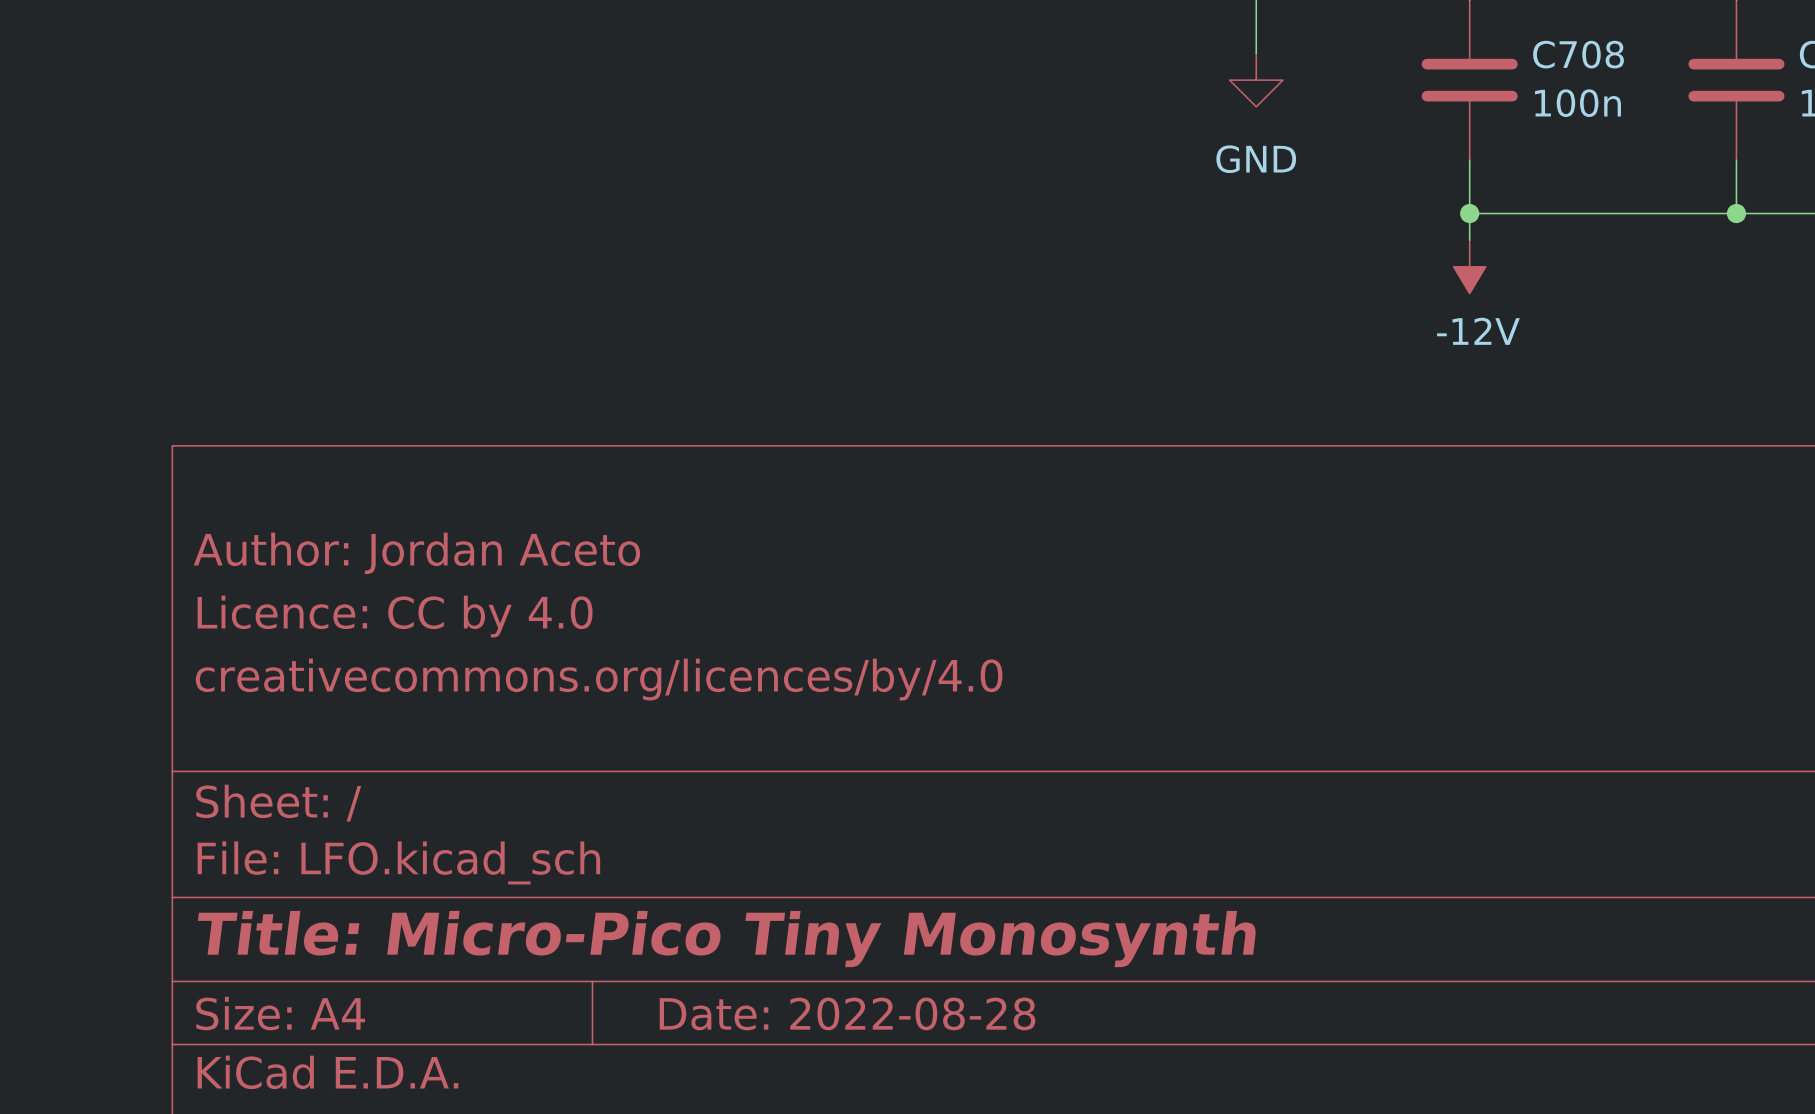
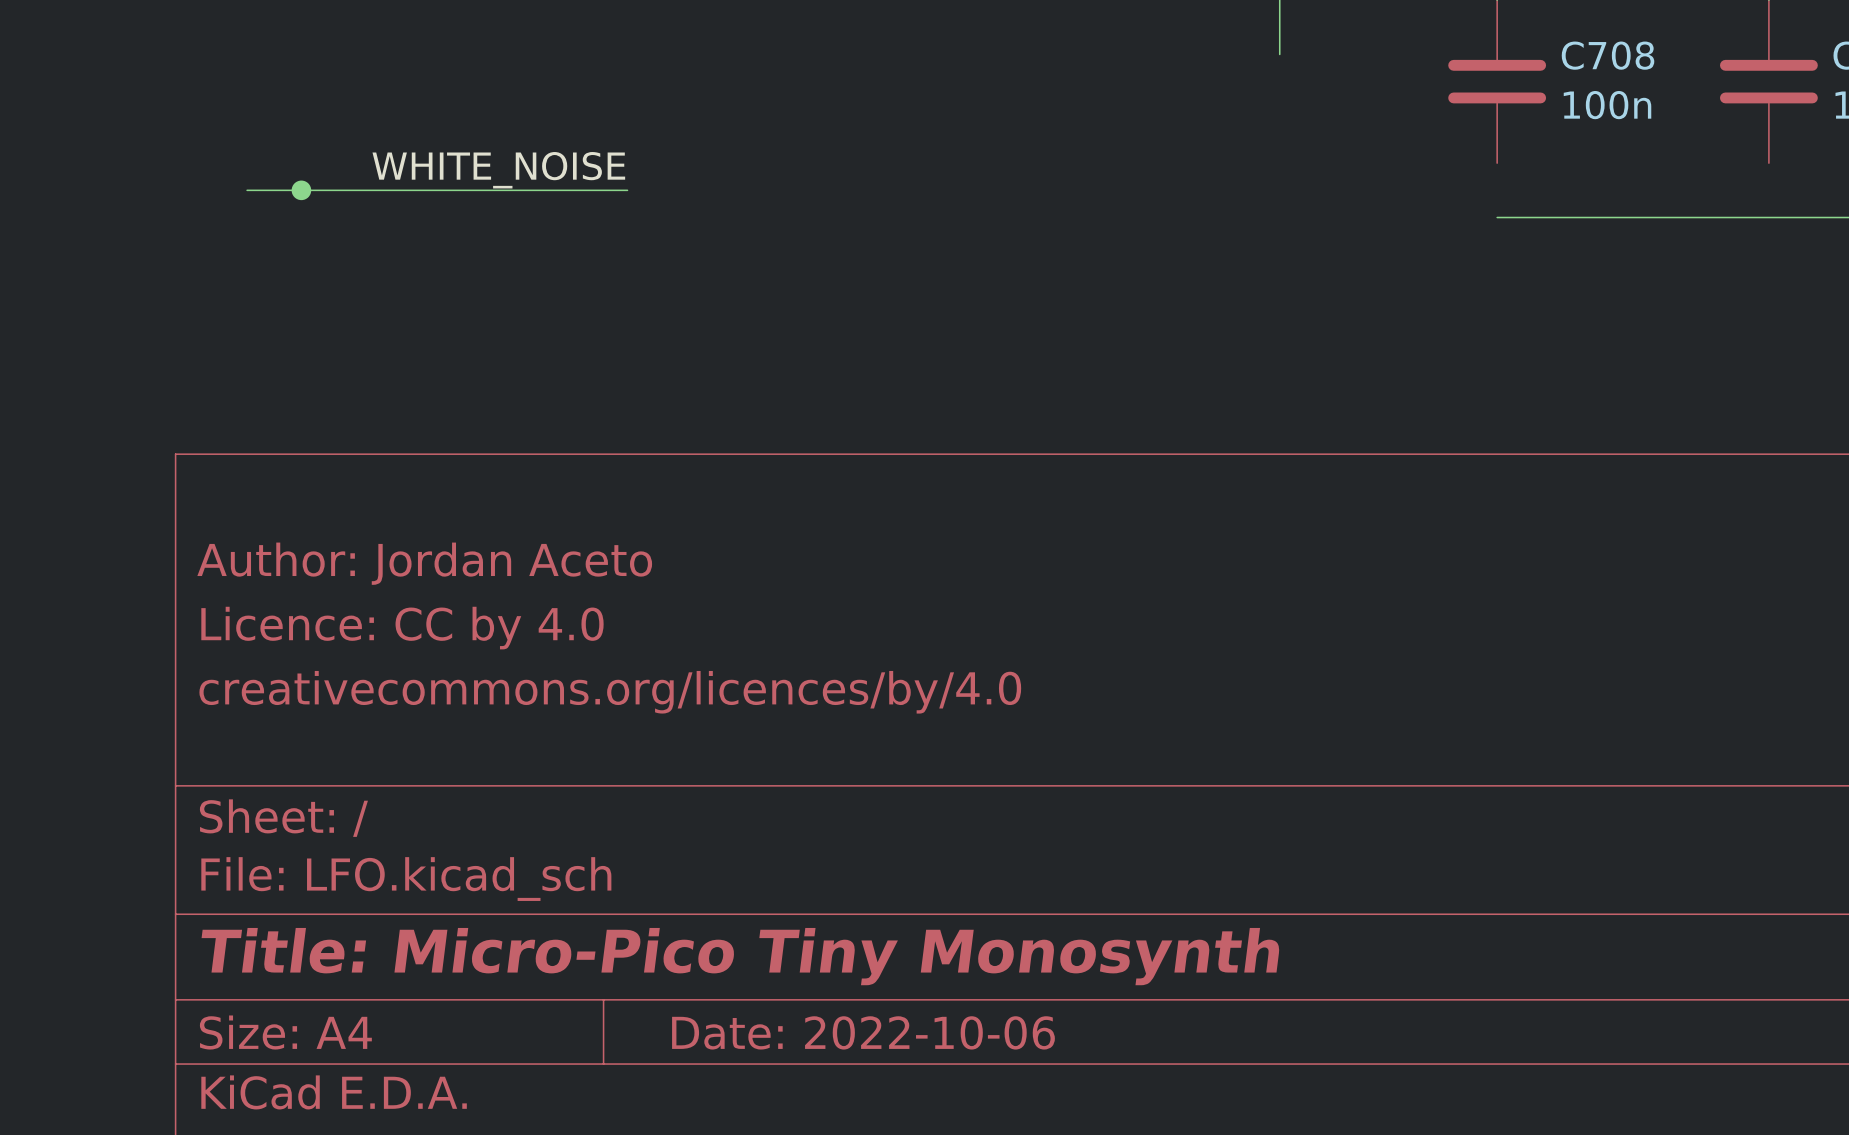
power symbol: GND (1256, 80) -> none
wire: (1469, 160) (1469, 240) -> none
wire: (1736, 160) (1736, 213) -> none
label: none -> WHITE_NOISE (498, 170)
wire: none -> (247, 190) (627, 190)
junction: none -> (301, 190)
junction: (1469, 213) -> none
junction: (1736, 213) -> none
power symbol: -12V (1469, 266) -> none
title block: Date: 2022-08-28 (847, 1013) -> Date: 2022-10-06 (863, 1032)

